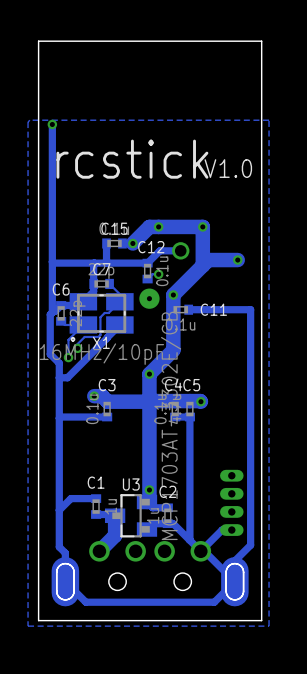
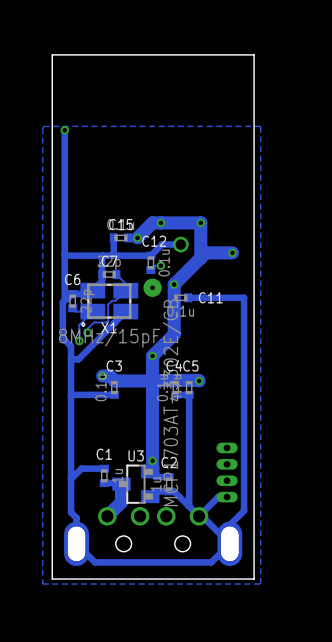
text: rcstick (132, 159) -> none
text: V1.0 (228, 168) -> none
X1 value: 16MHz/10pF (101, 354) -> 8MHz/15pF (109, 337)
part footprint: [51, 541, 249, 607] -> [64, 507, 243, 567]

